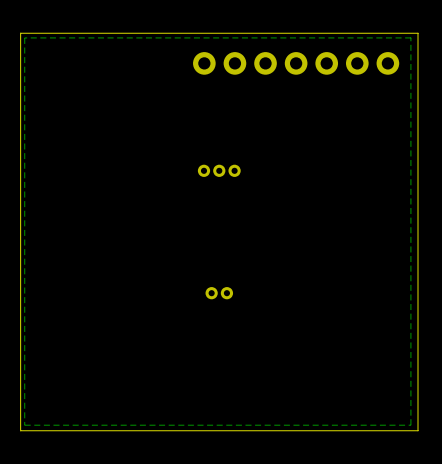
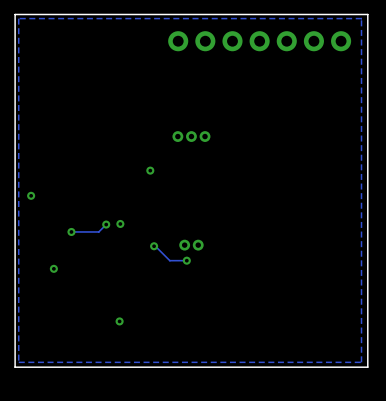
via: none -> (150, 170)
via: none -> (31, 195)
via: none -> (120, 223)
track: none -> (106, 224) (98, 231) (71, 231)
via: none -> (106, 224)
via: none -> (71, 231)
track: none -> (154, 246) (169, 260) (186, 260)
via: none -> (154, 246)
via: none -> (186, 260)
via: none -> (53, 268)
via: none -> (119, 321)

